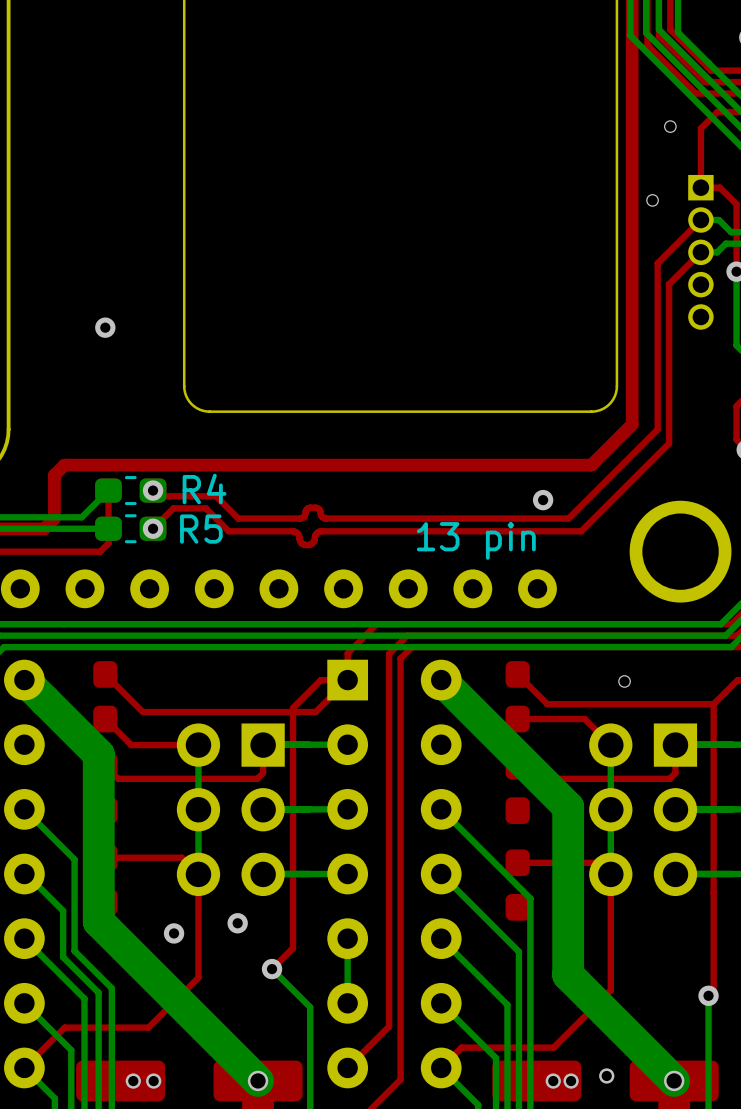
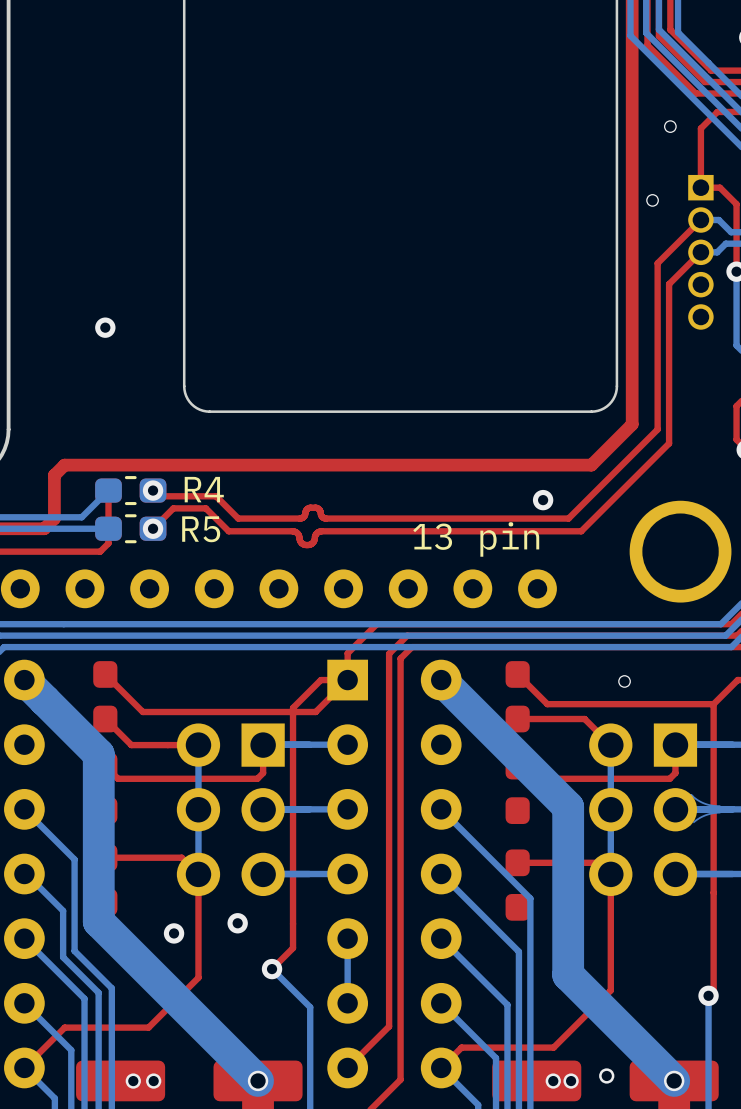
bottom zone outline: none -> (693, 796) (707, 804) (720, 806) (720, 812) (707, 814) (693, 822)

